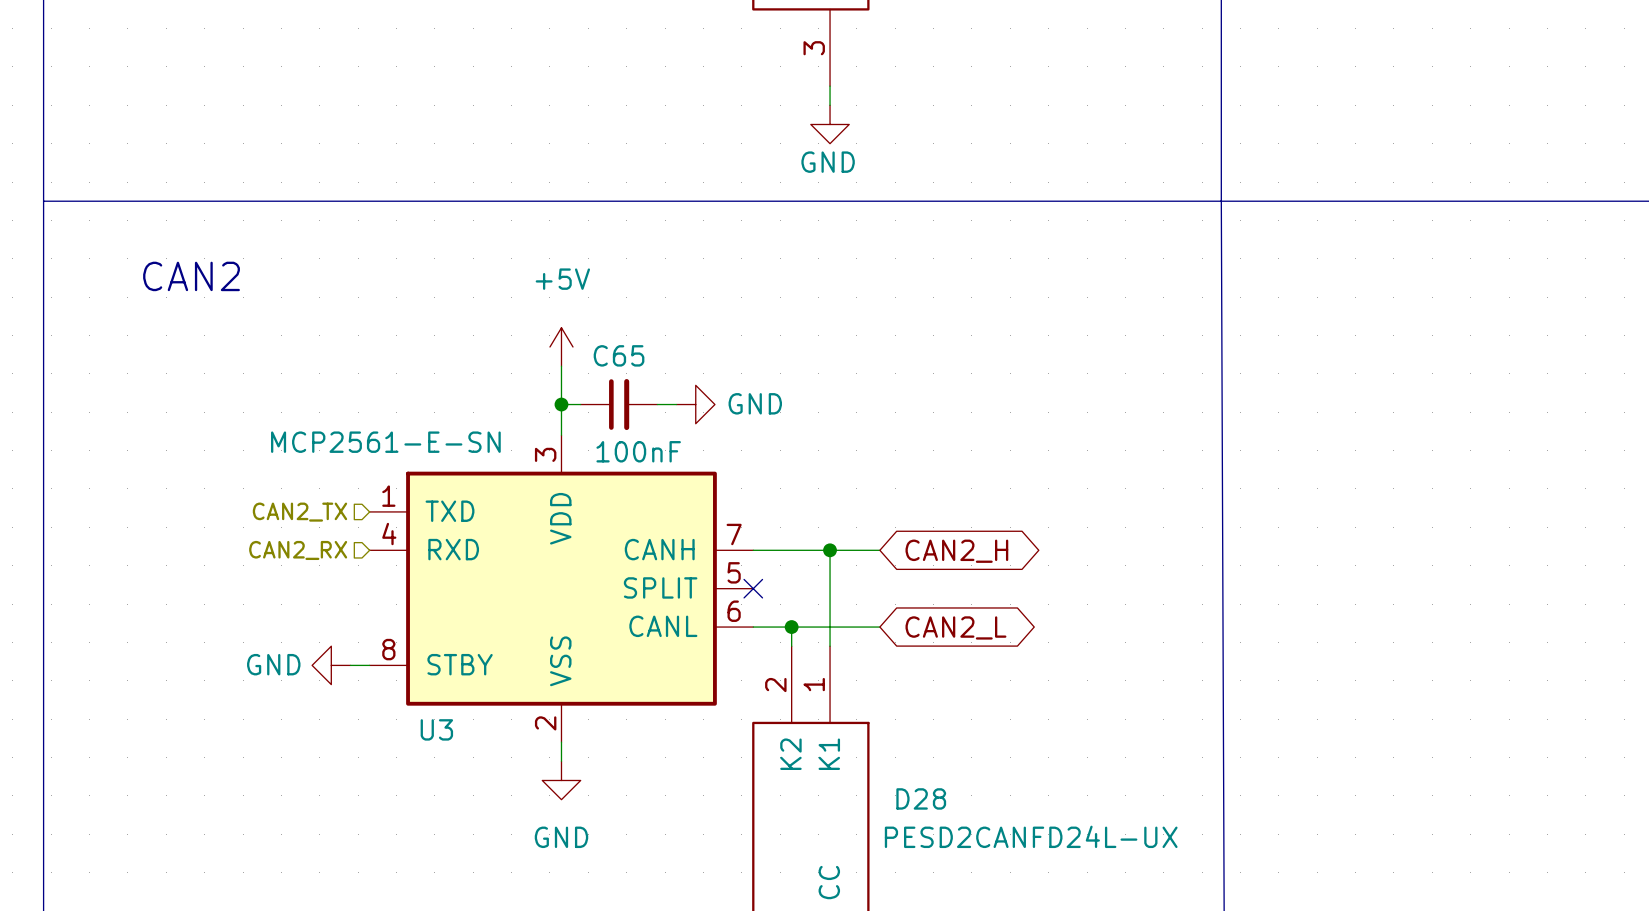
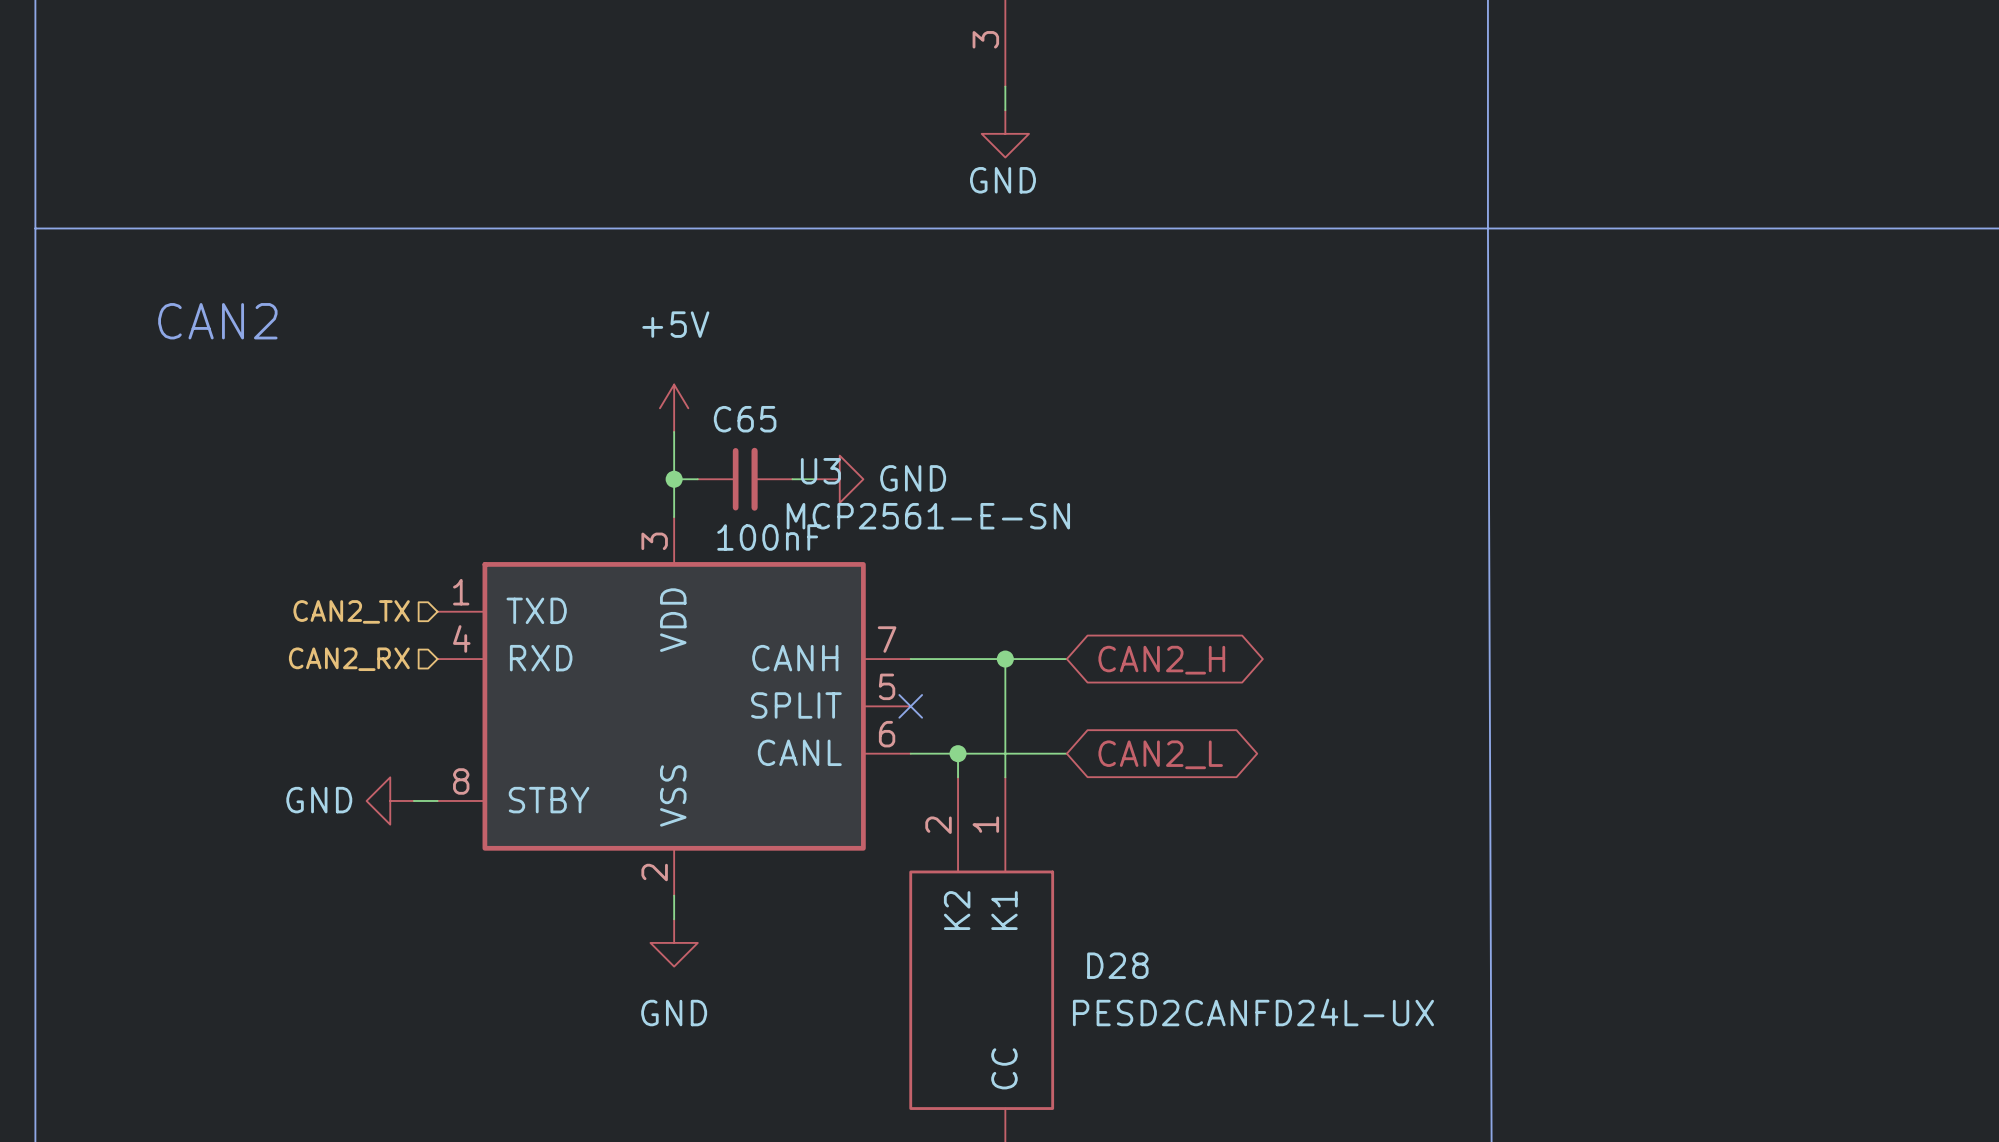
U3 value position: MCP2561-E-SN (385, 442) -> MCP2561-E-SN (928, 516)
U3 name position: U3 (436, 729) -> U3 (820, 471)

